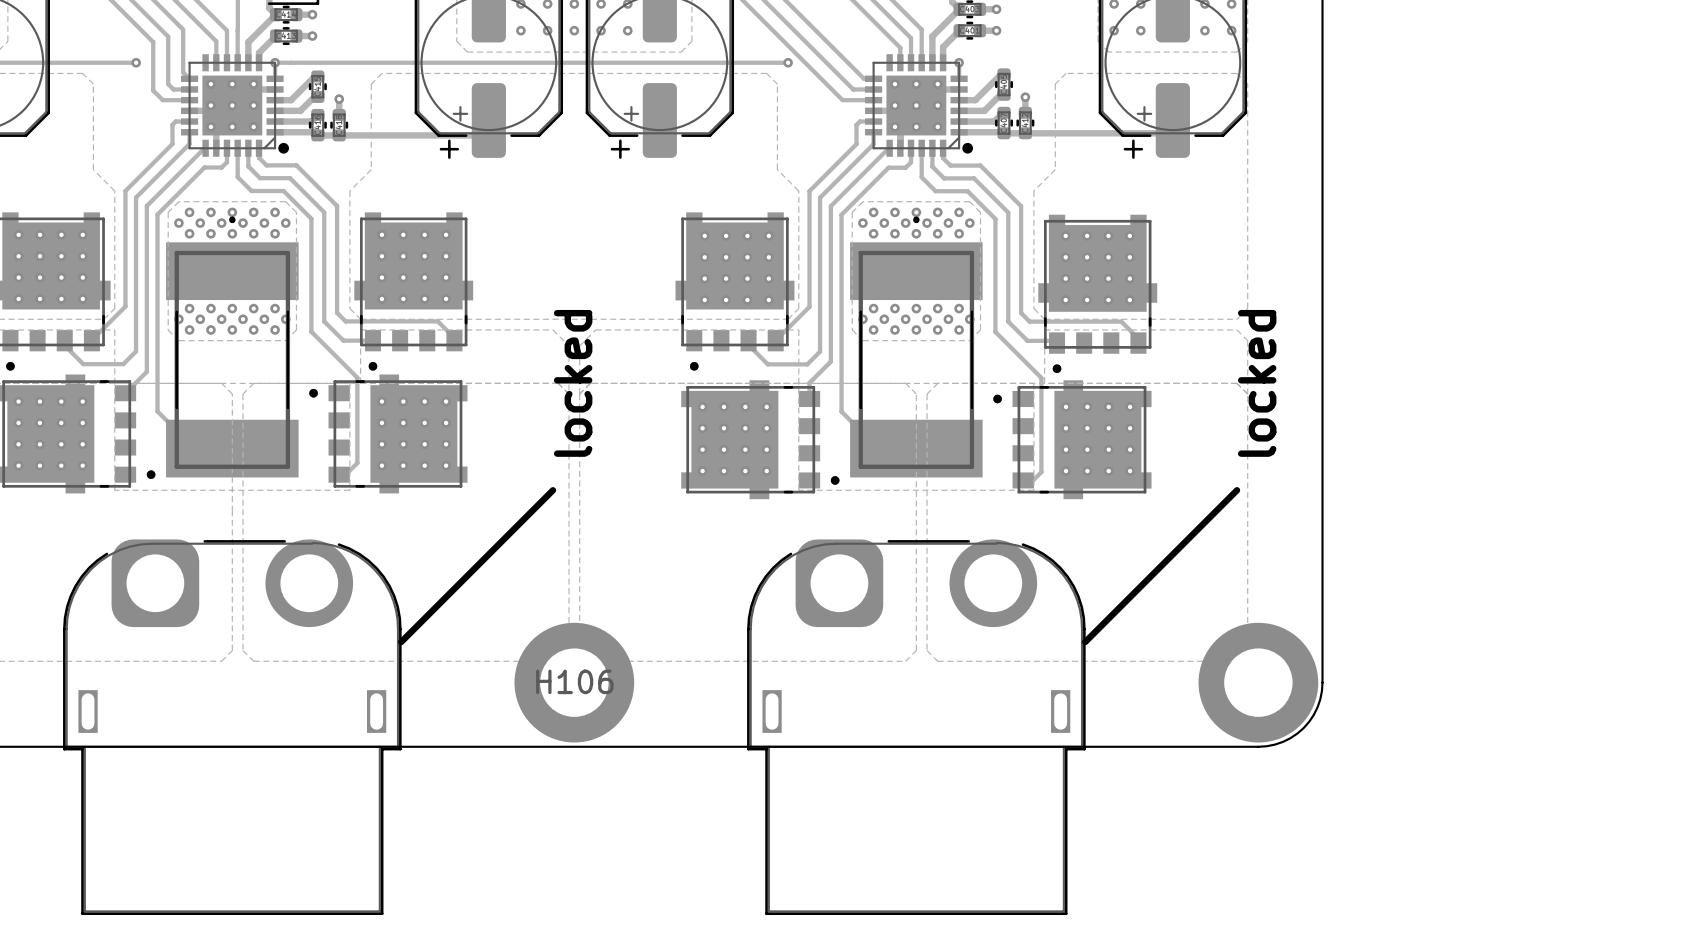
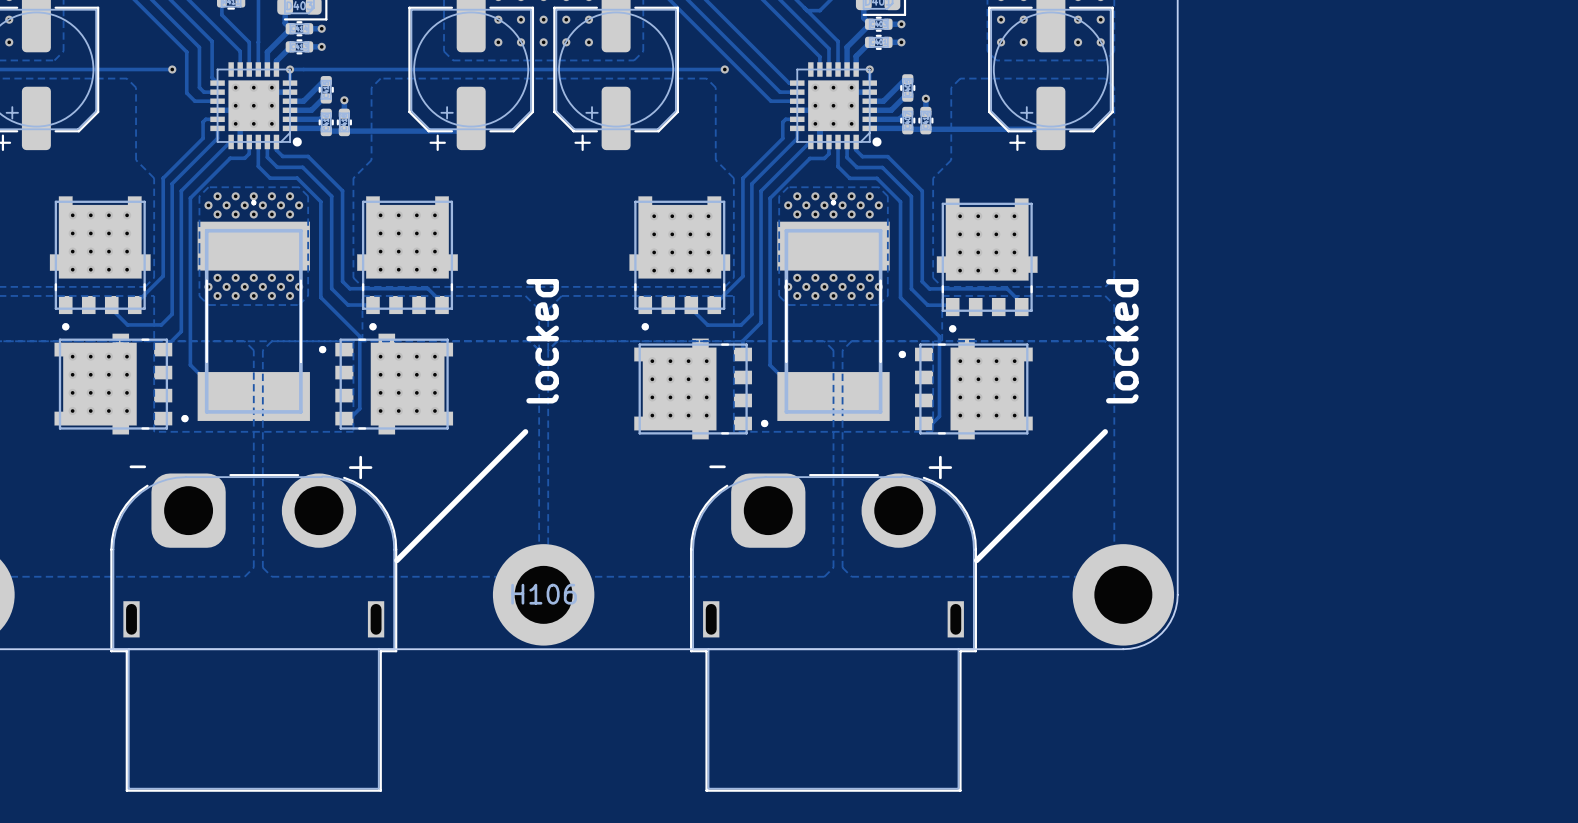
part text: none -> - (137, 466)
part text: none -> - (717, 466)
part text: none -> + (360, 467)
part text: none -> + (940, 467)

